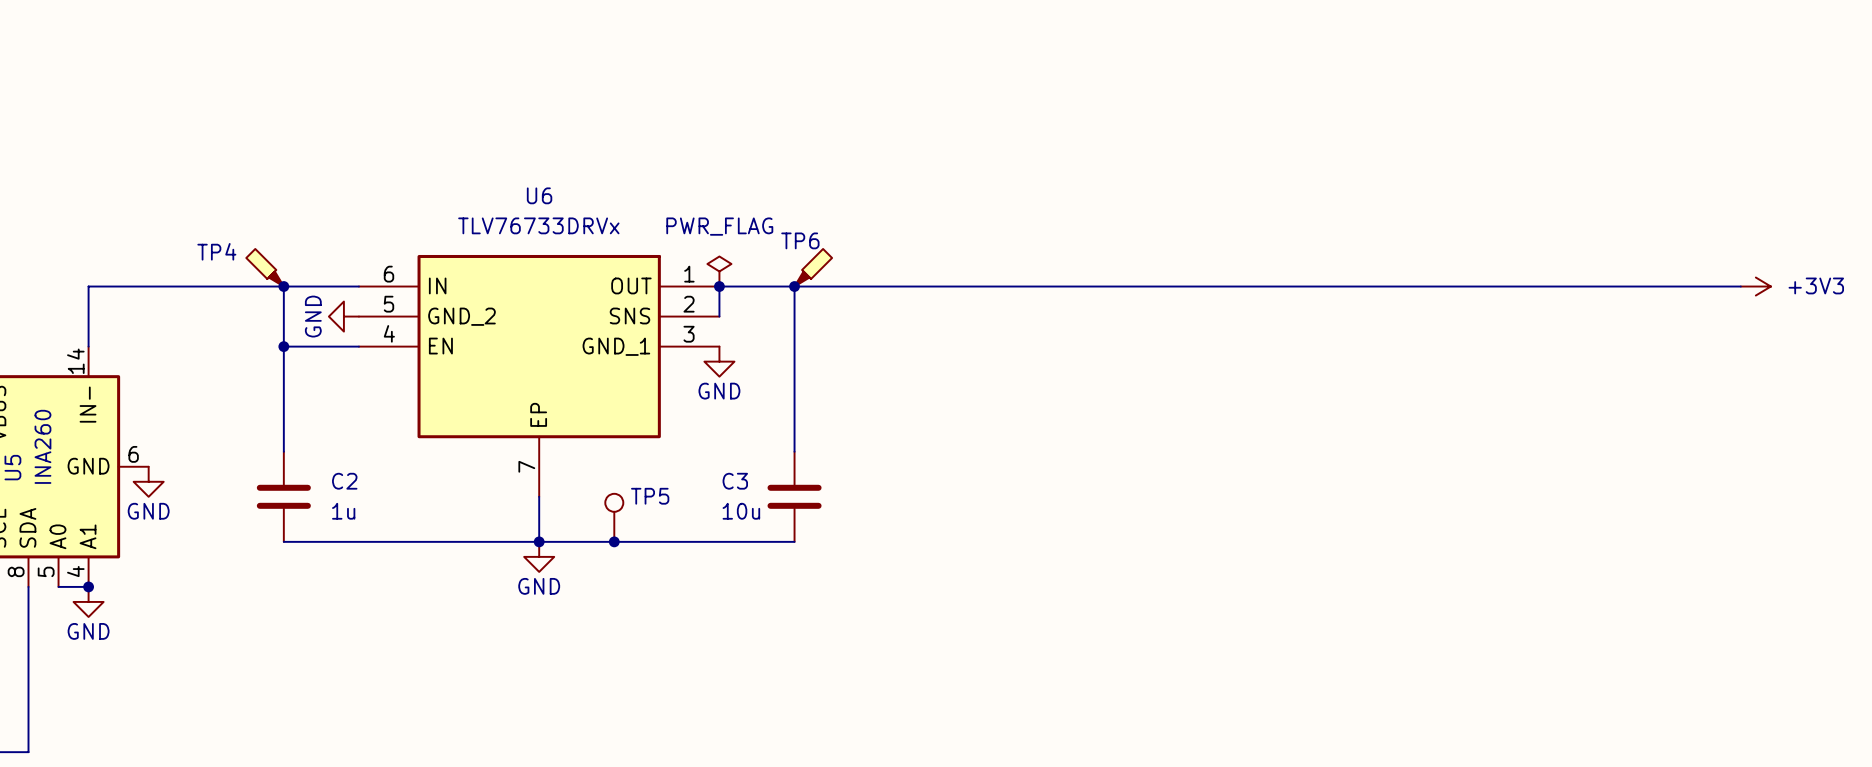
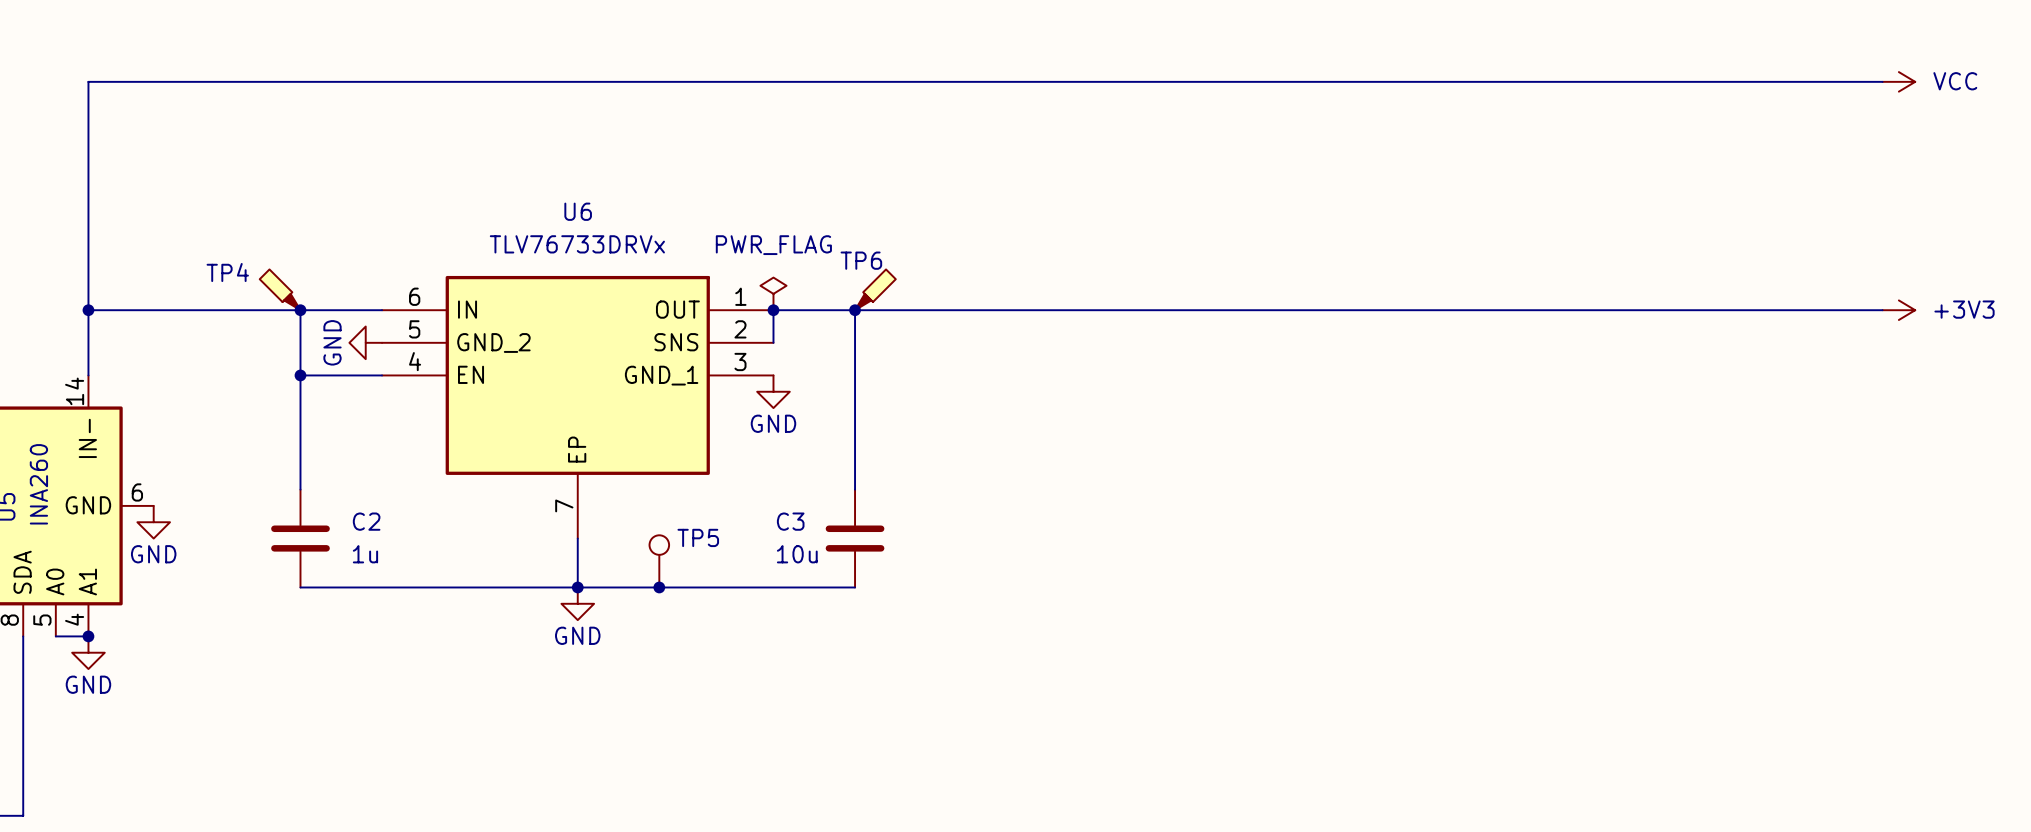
wire: none -> (1882, 81) (88, 81) (88, 310)
power symbol: none -> VCC (1898, 81)
junction: none -> (88, 310)

